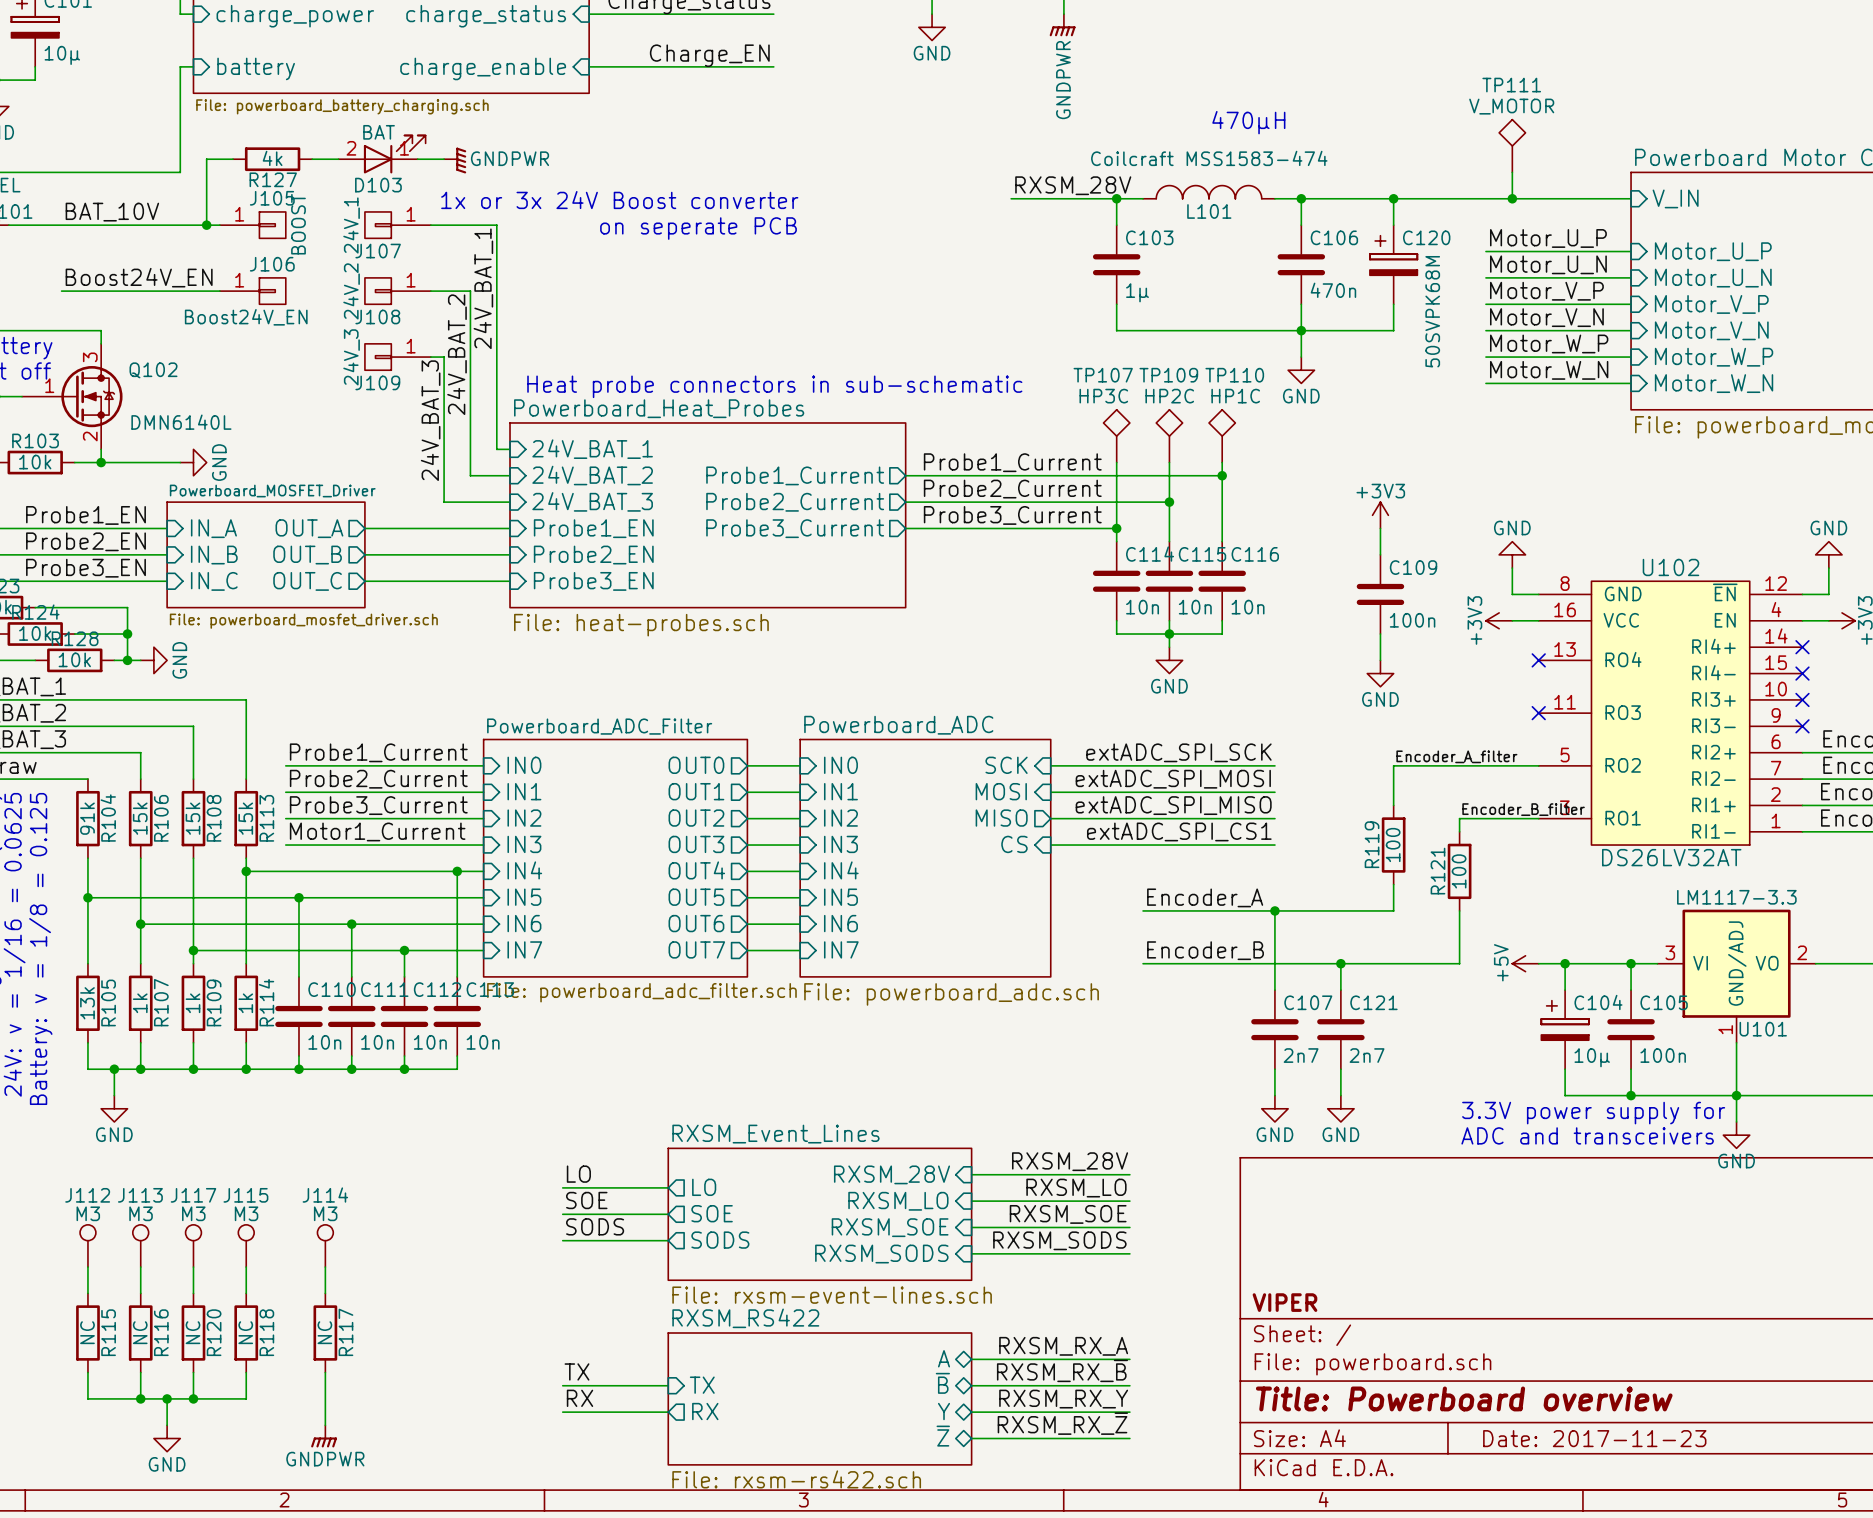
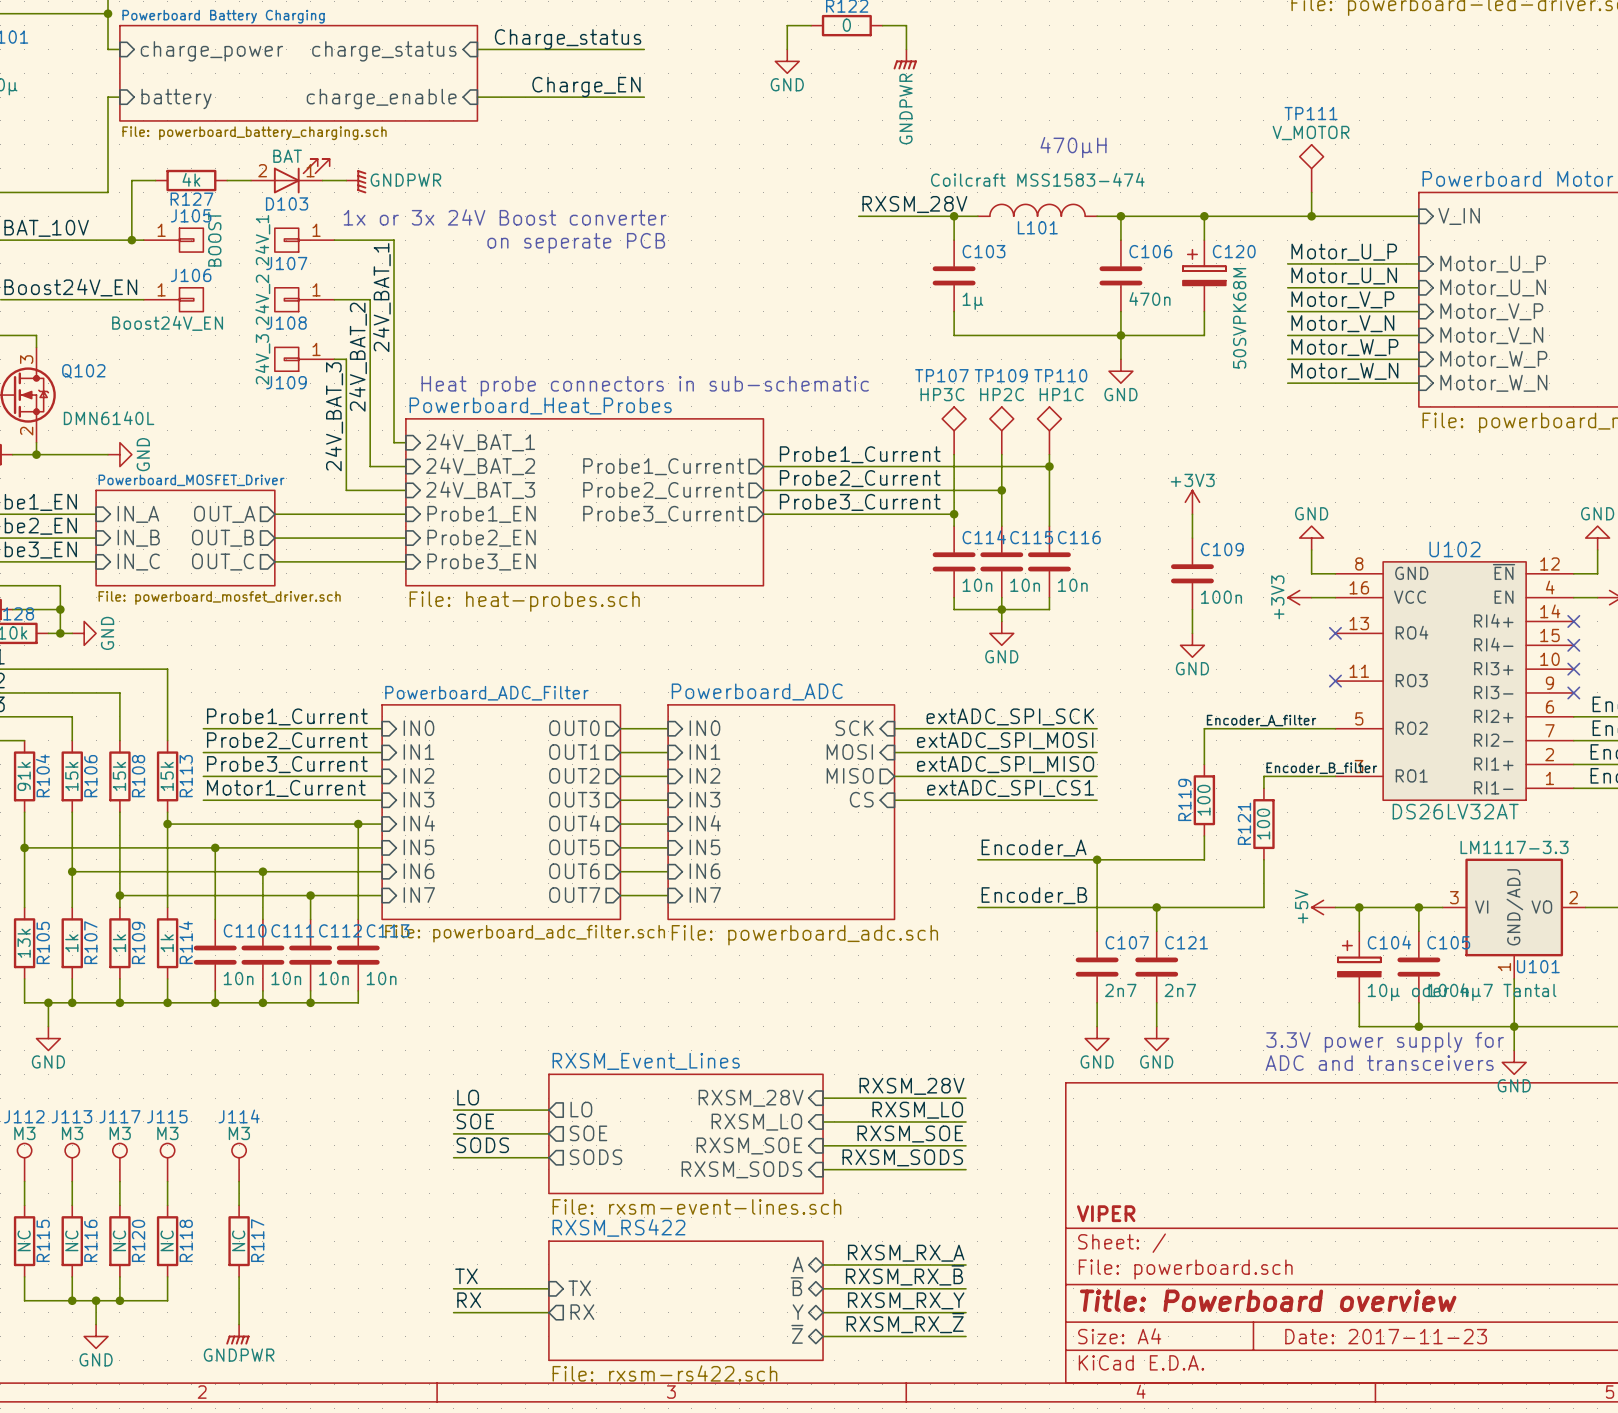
C104 value: 10µ (1592, 1057) -> 10µ oder 4µ7 Tantal (1462, 992)

